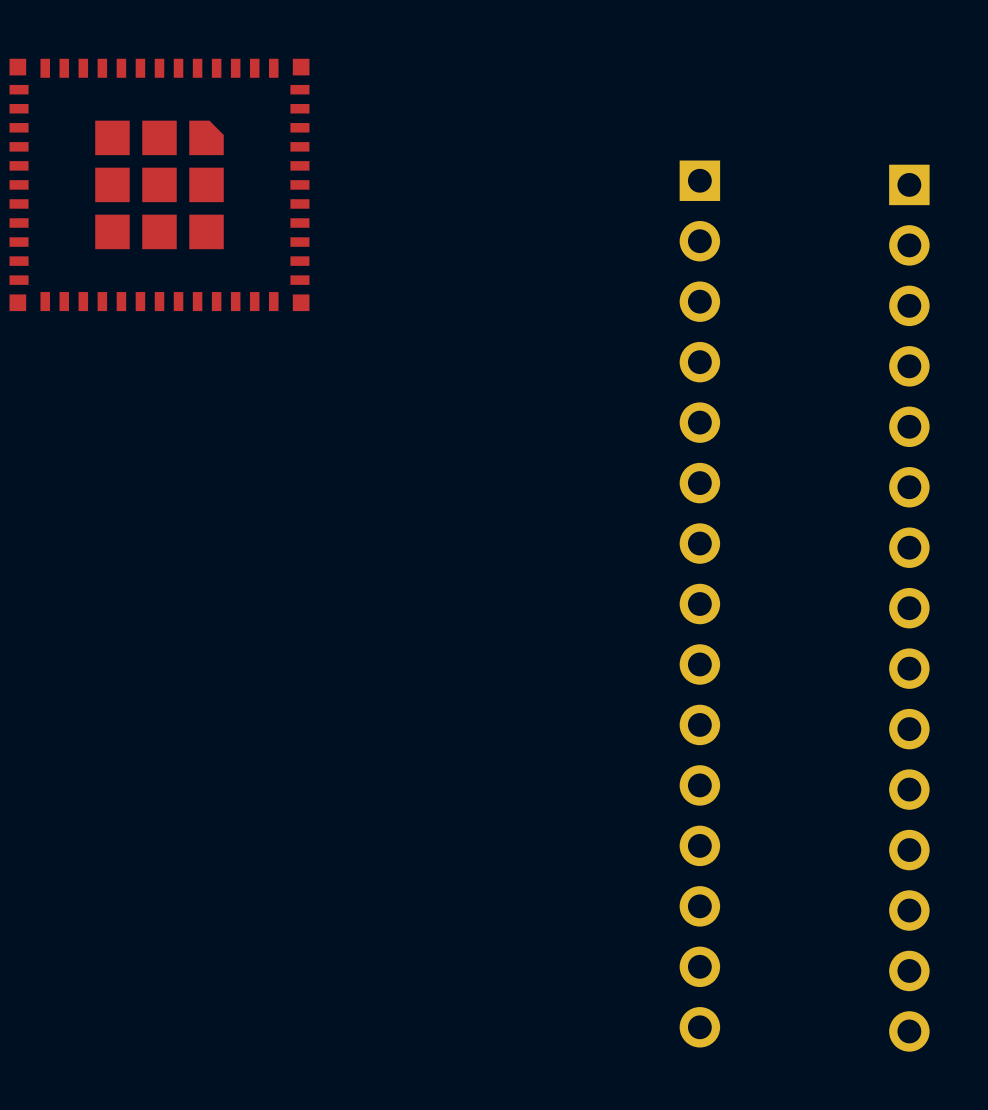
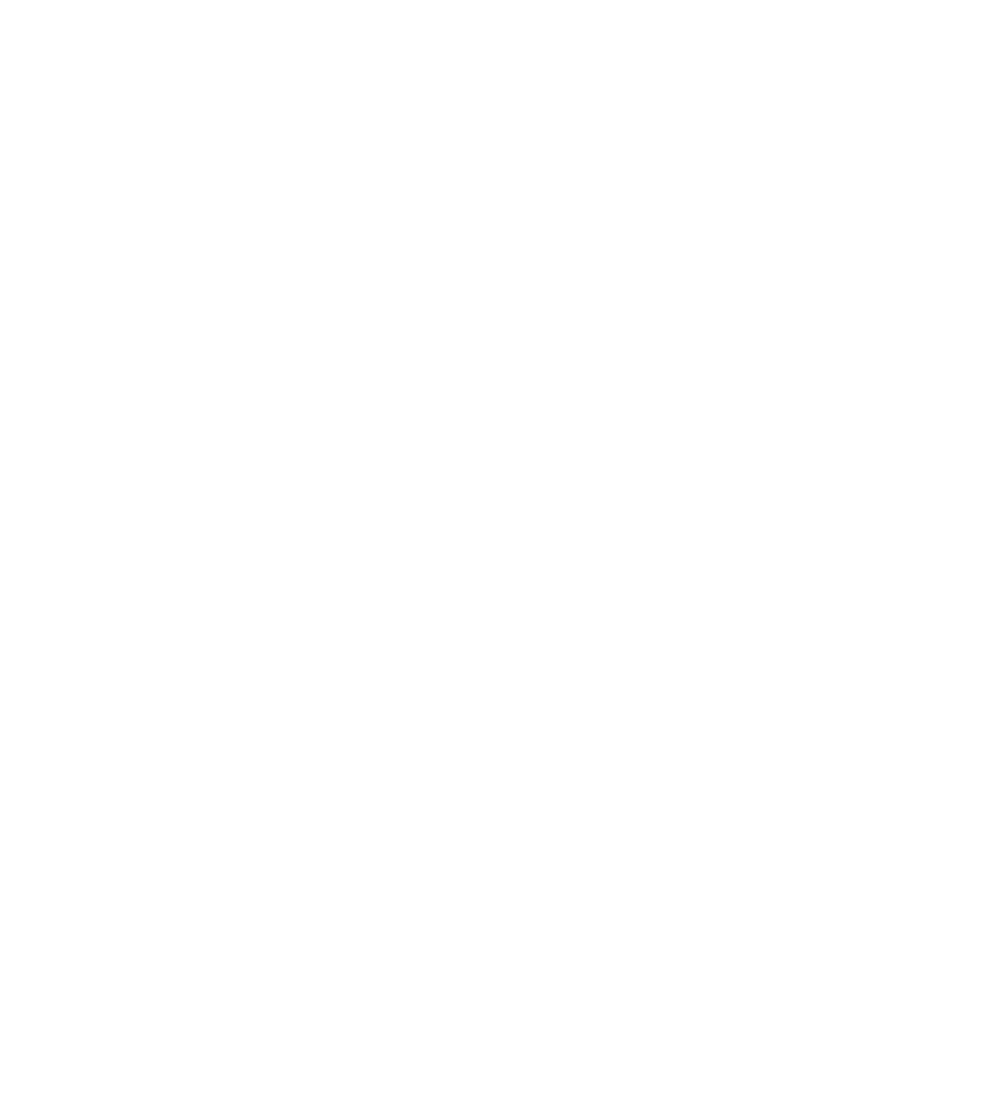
part: (159, 184) -> none
part: (699, 604) -> none
part: (909, 608) -> none

